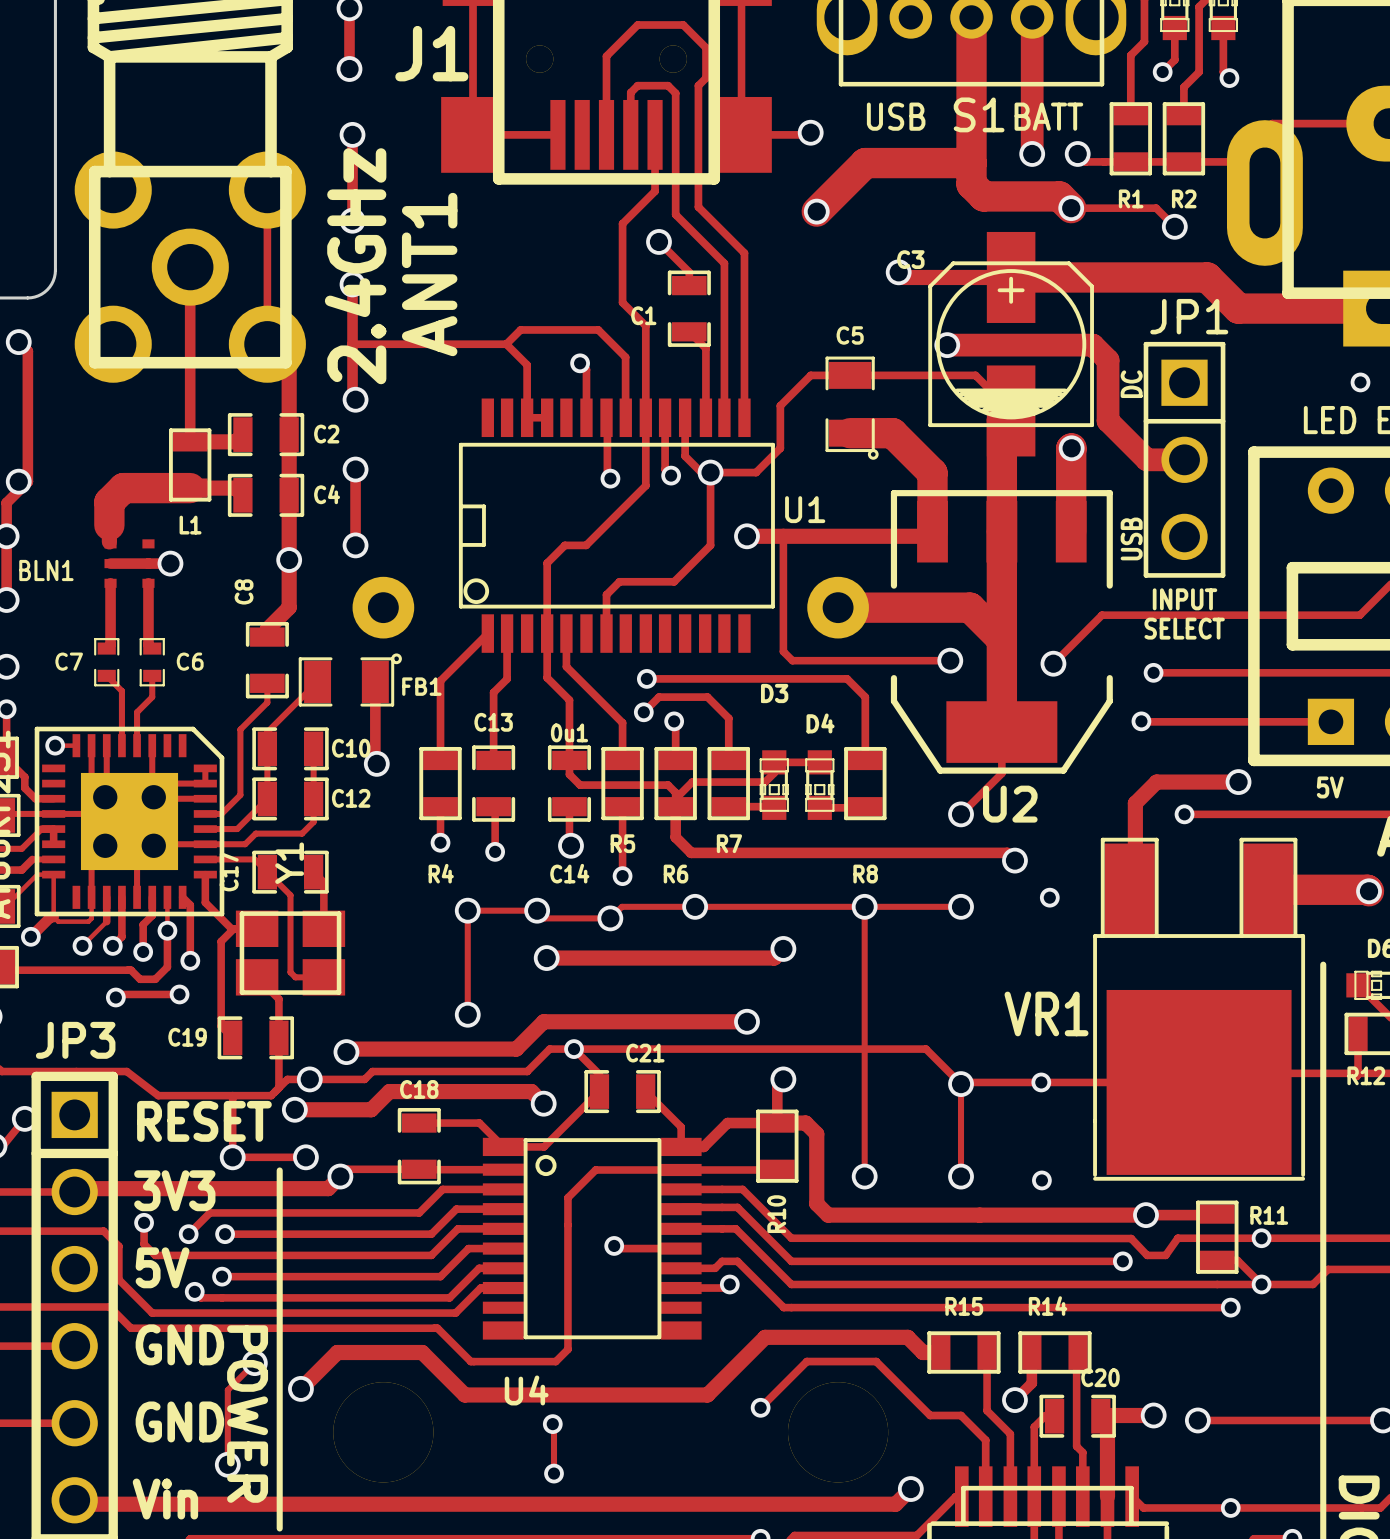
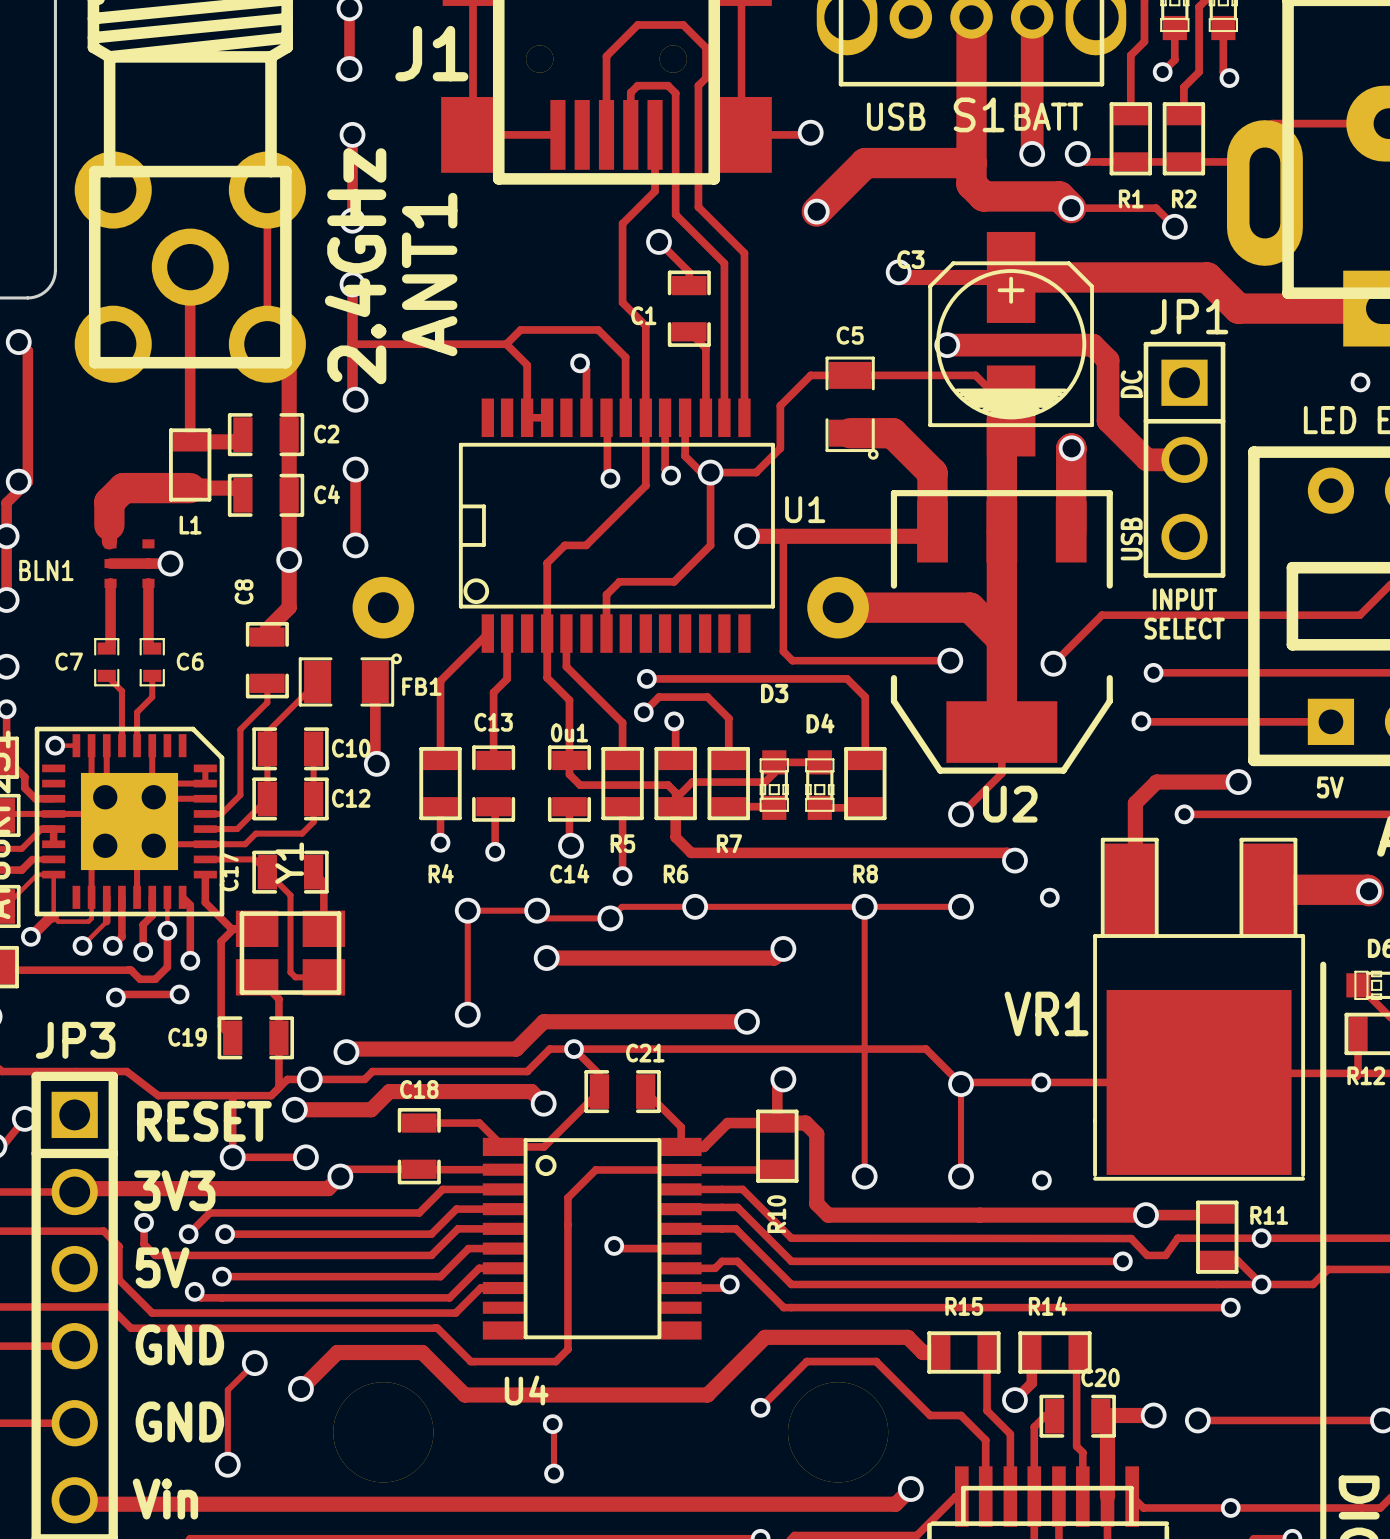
line: (279, 1170) (279, 1528) -> none
text: POWER (247, 1414) -> none

